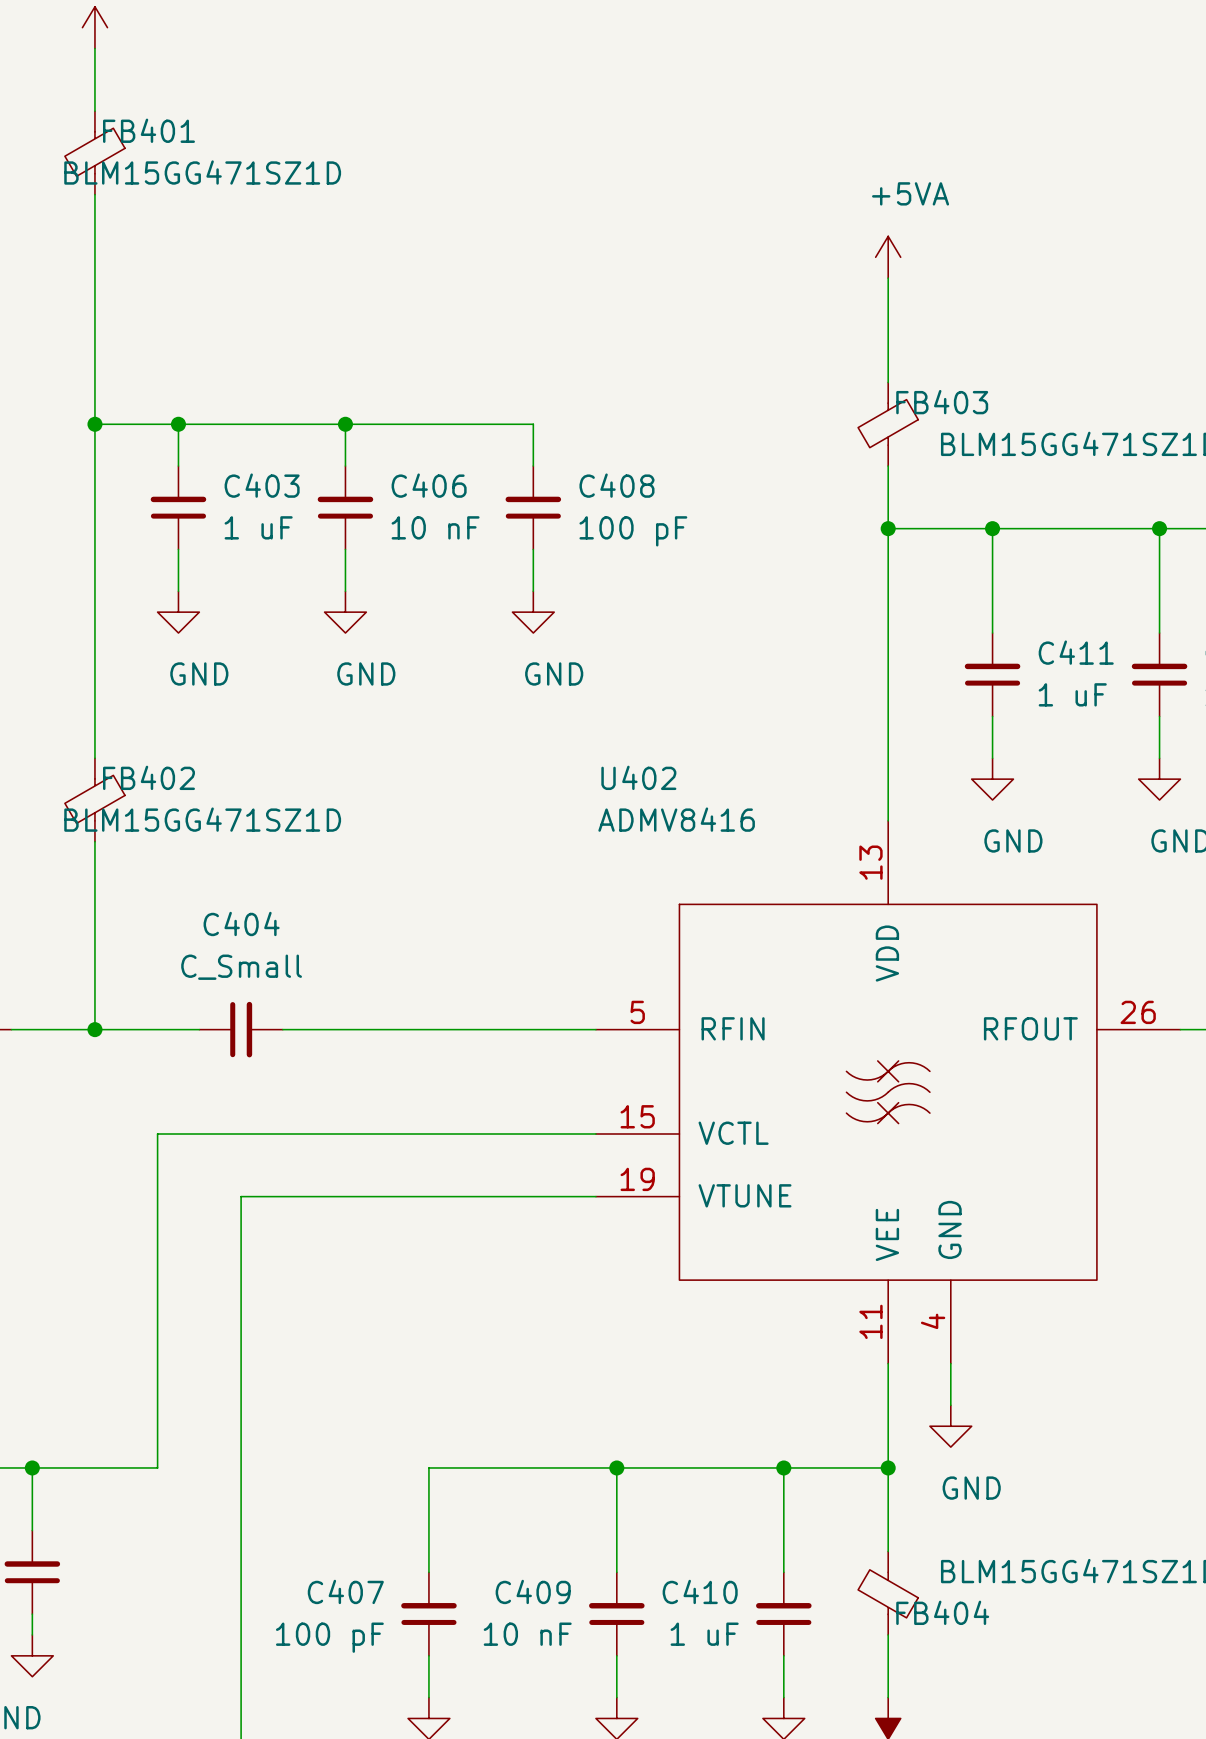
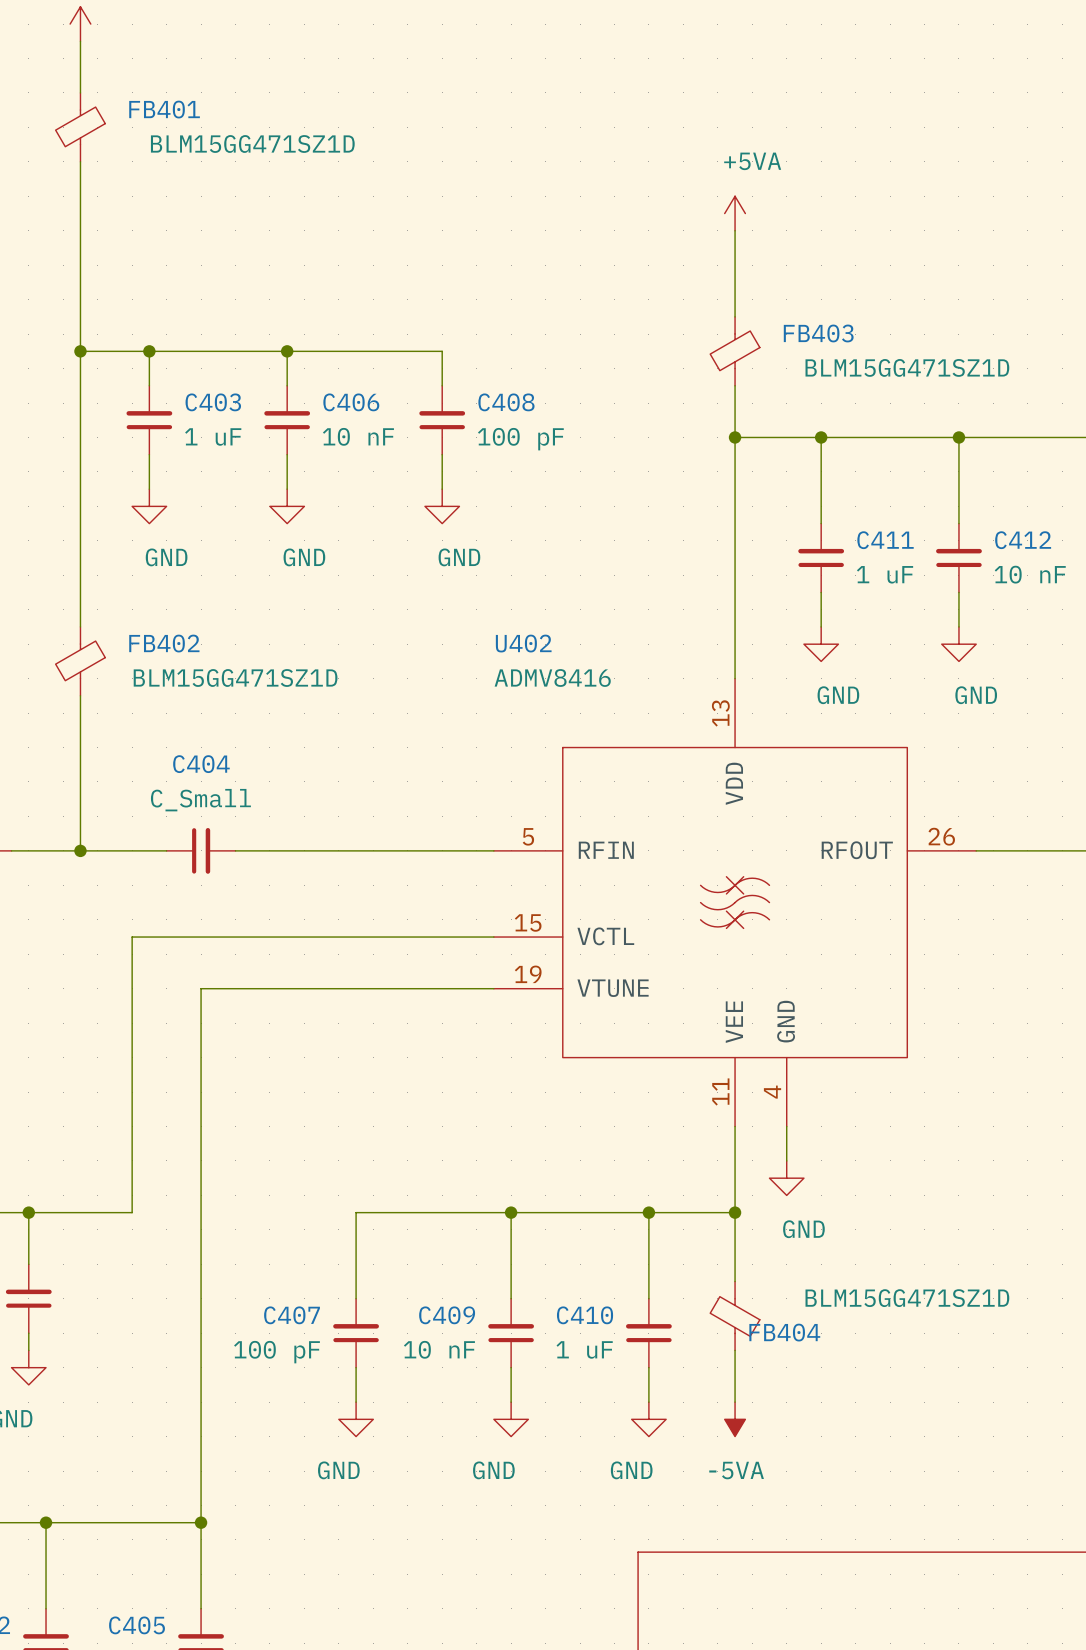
FB401 name position: FB401 (148, 130) -> FB401 (164, 109)
FB401 value position: BLM15GG471SZ1D (202, 172) -> BLM15GG471SZ1D (252, 143)
FB403 name position: FB403 (942, 402) -> FB403 (818, 333)
FB402 name position: FB402 (148, 777) -> FB402 (164, 643)
FB402 value position: BLM15GG471SZ1D (202, 819) -> BLM15GG471SZ1D (235, 677)

